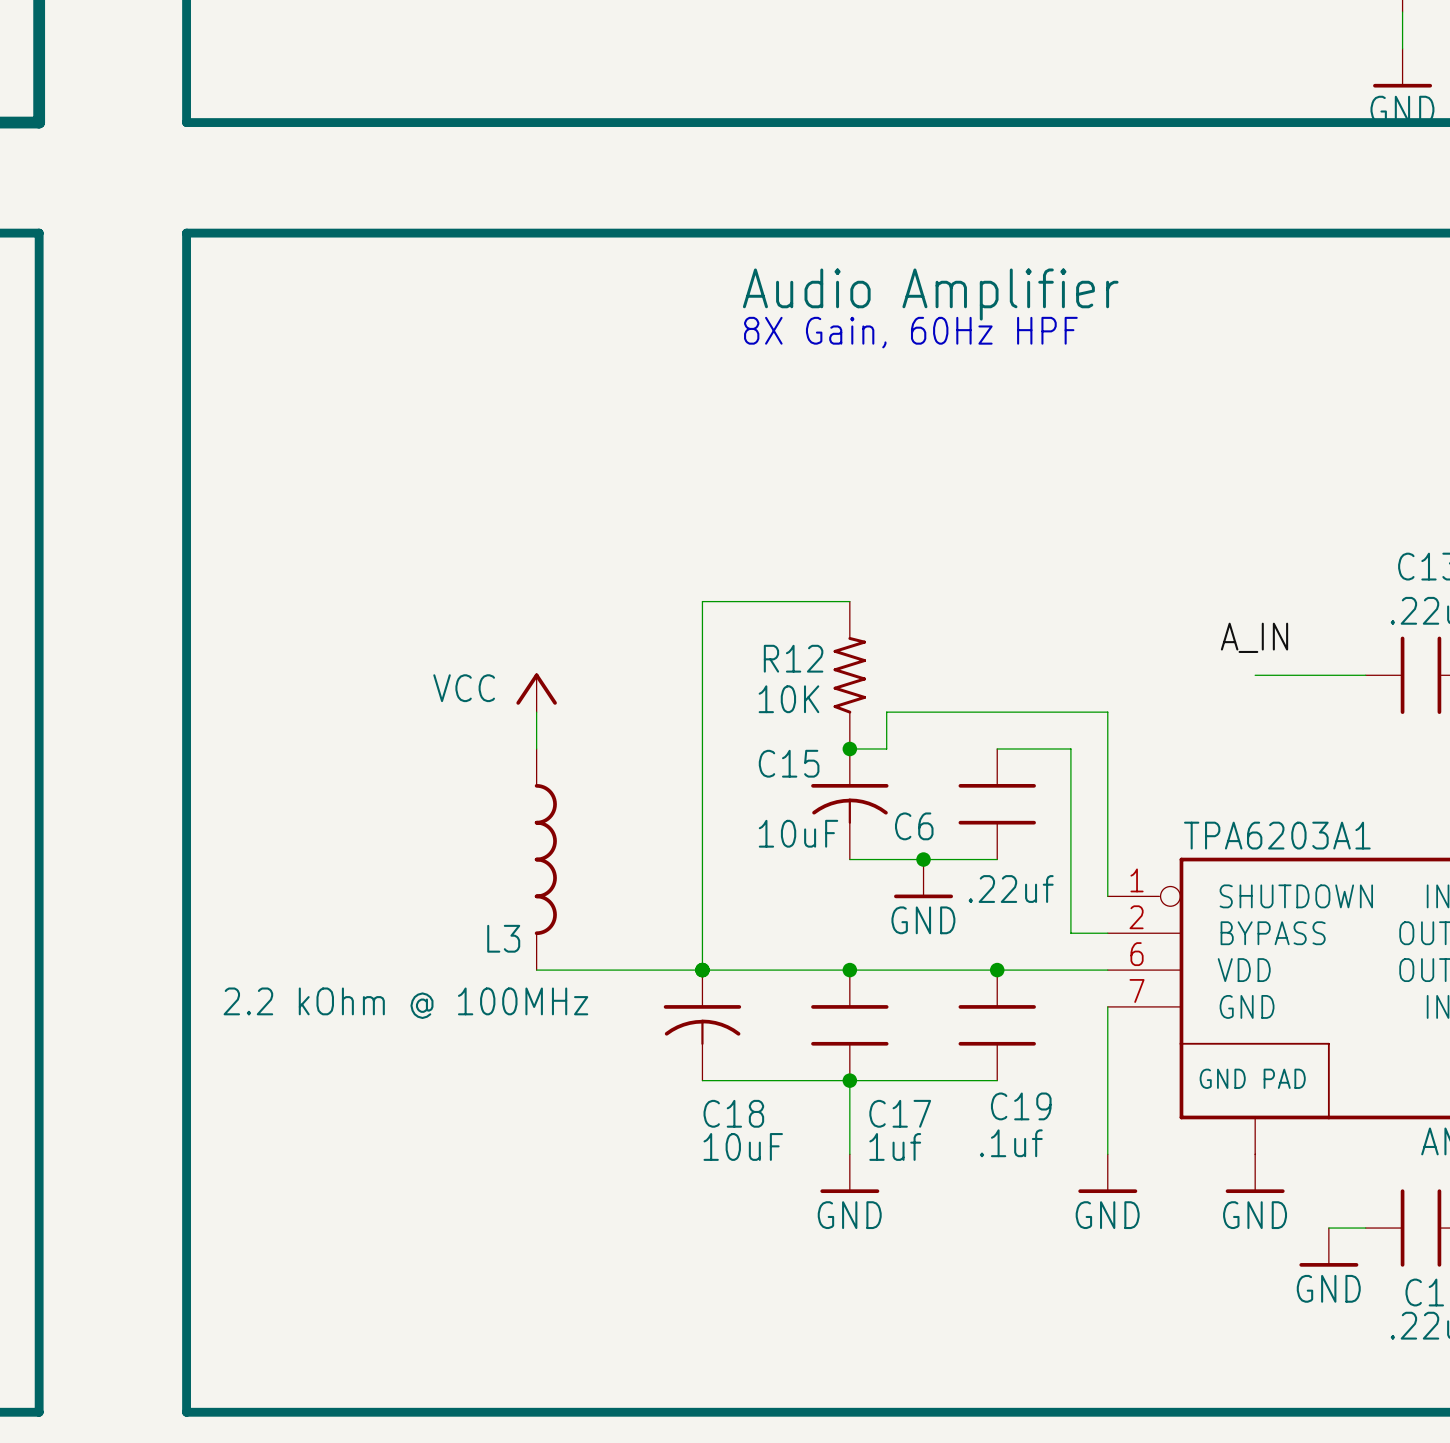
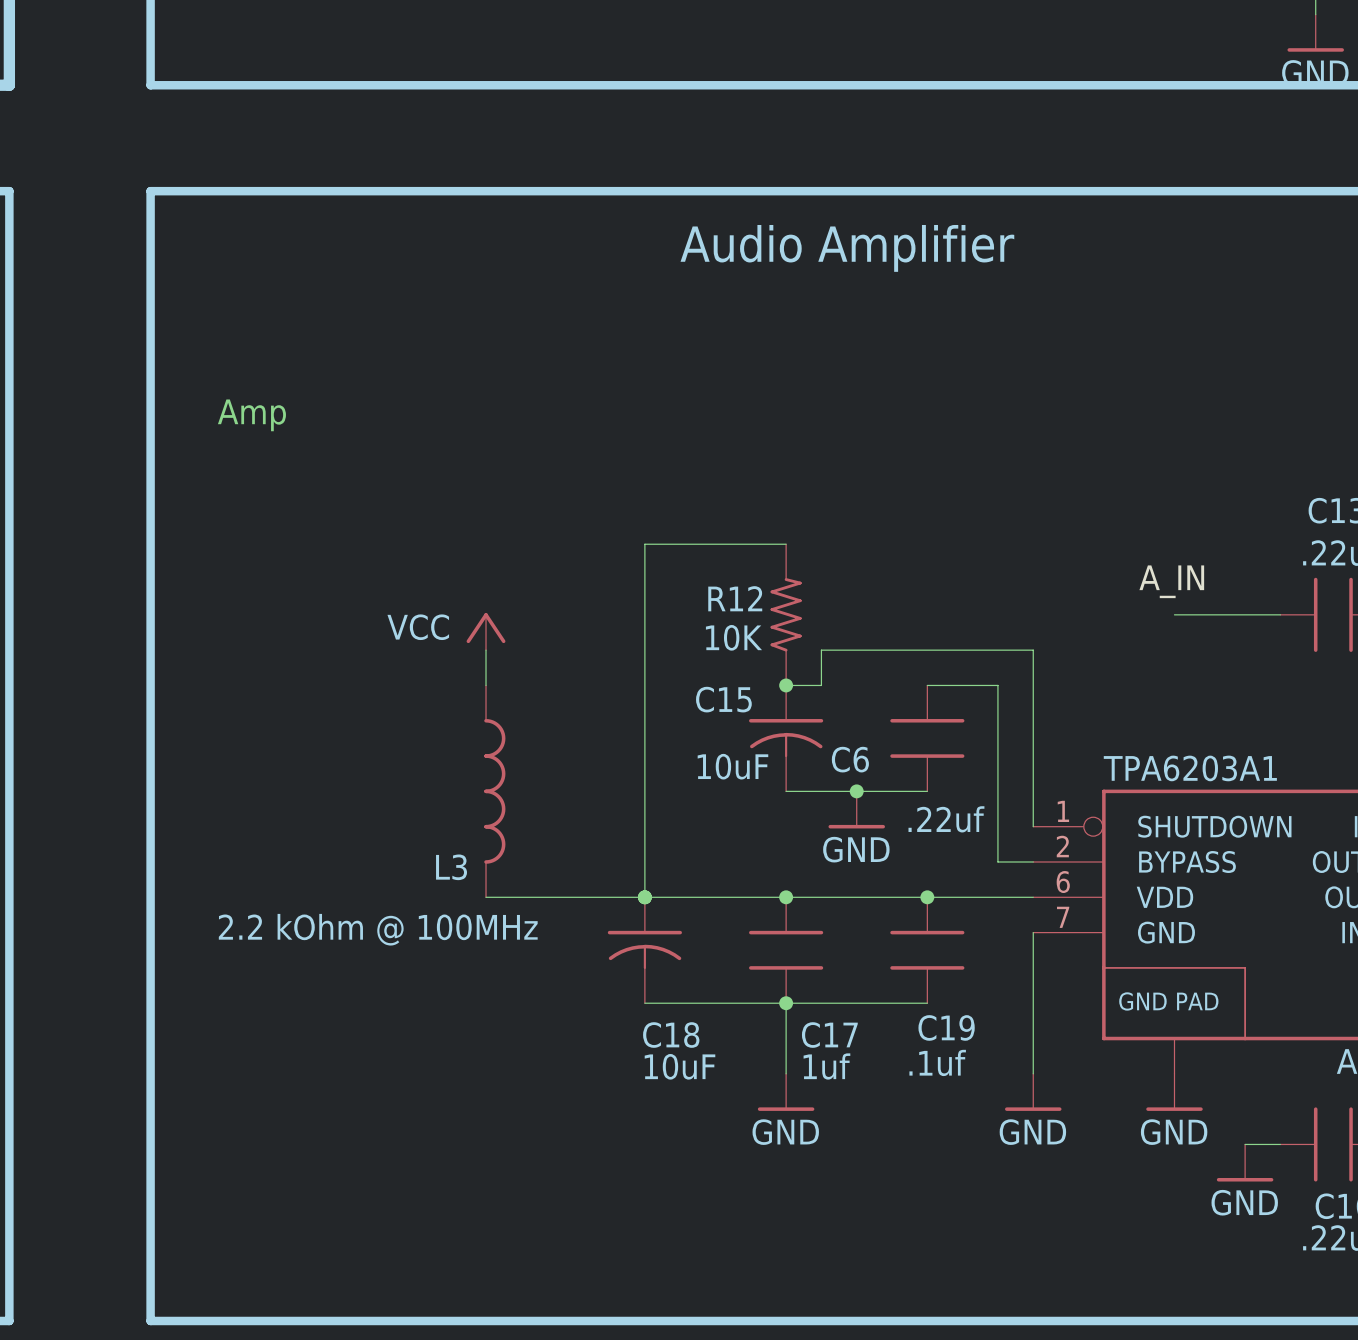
text: 8X Gain, 60Hz HPF (910, 332) -> none
text: none -> Amp (251, 415)

